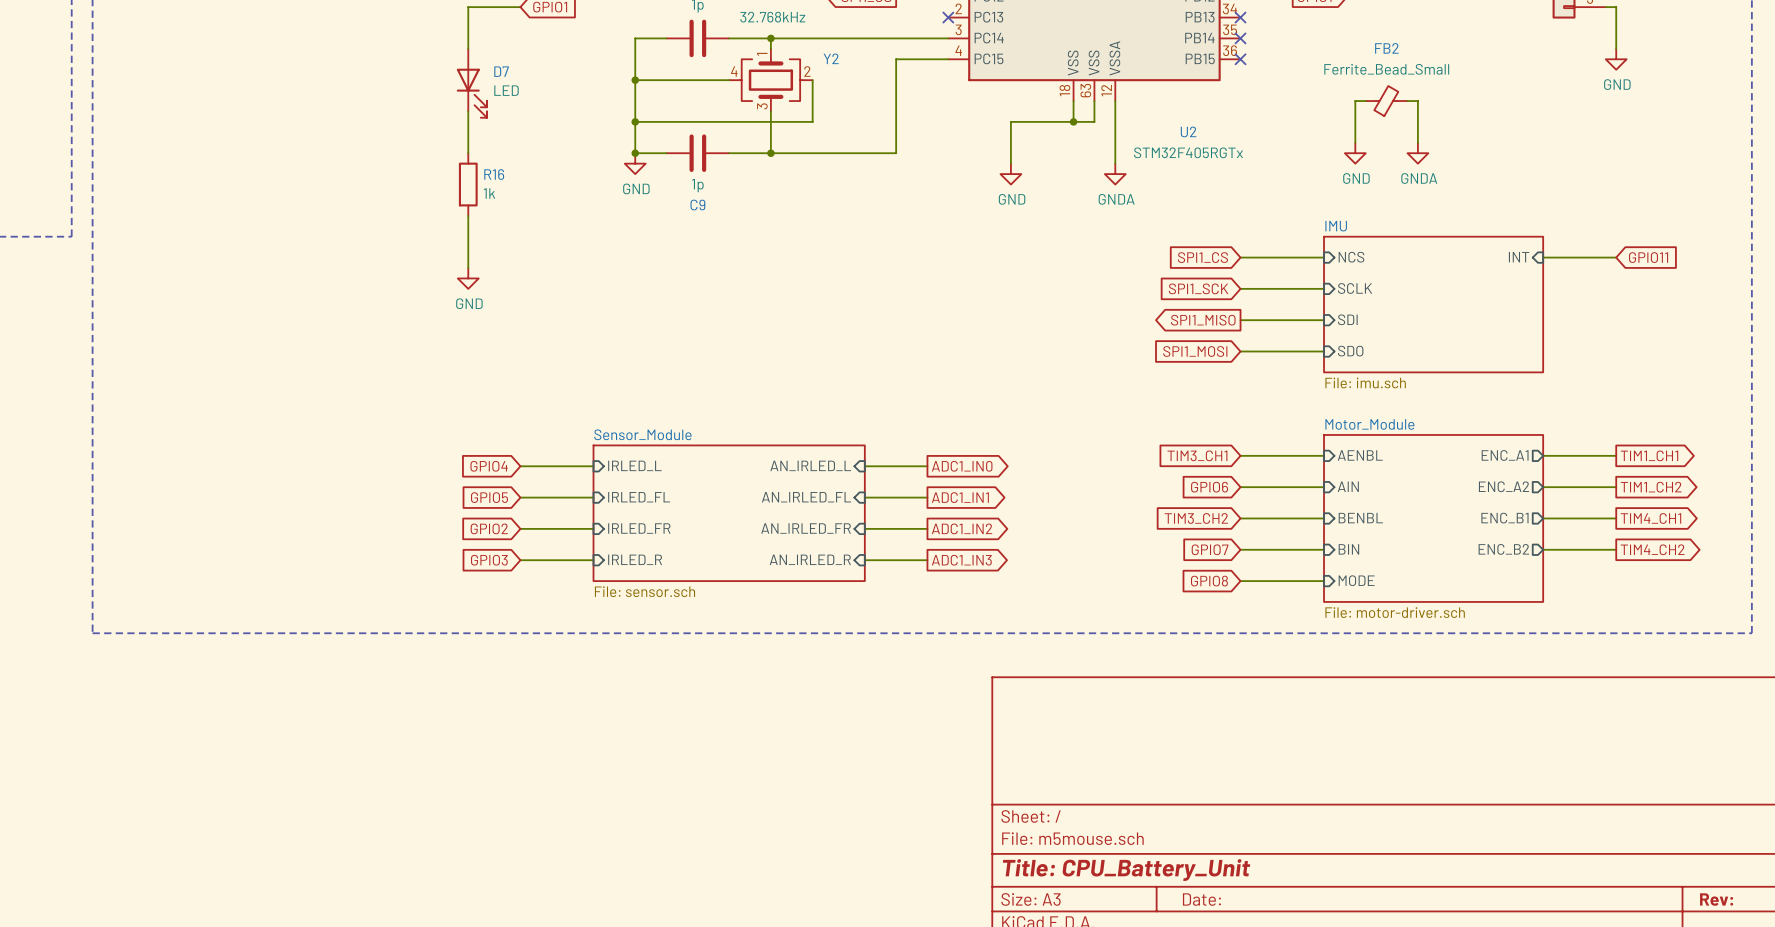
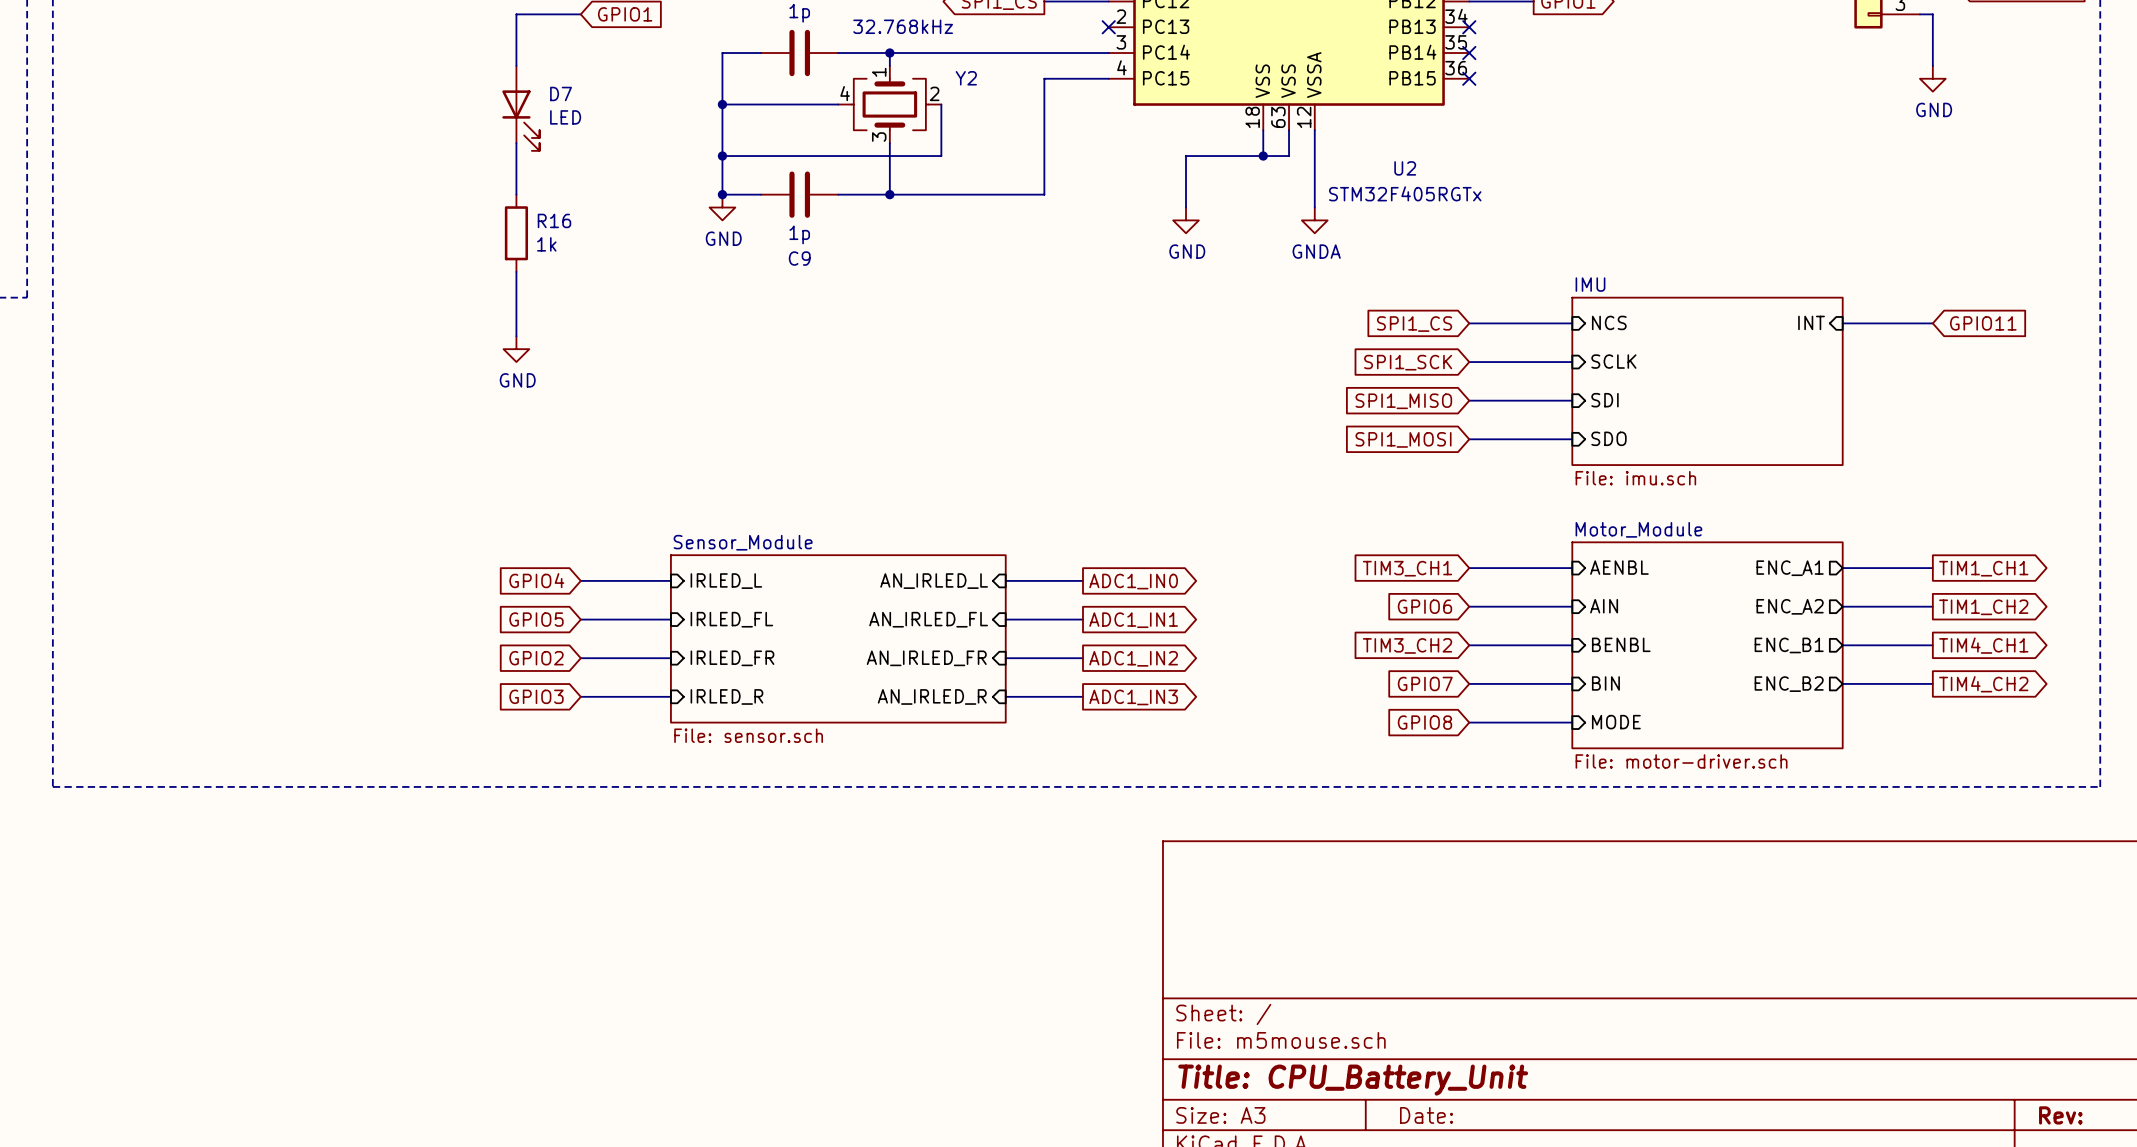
wire: (1365, 101) (1355, 101) (1355, 142) -> none
FB2: Ferrite_Bead_Small (1386, 101) -> none
wire: (1407, 101) (1417, 101) (1417, 142) -> none
power symbol: GND (1355, 153) -> none
power symbol: GNDA (1417, 153) -> none
global label shape: output (1203, 320) -> input (1403, 401)

